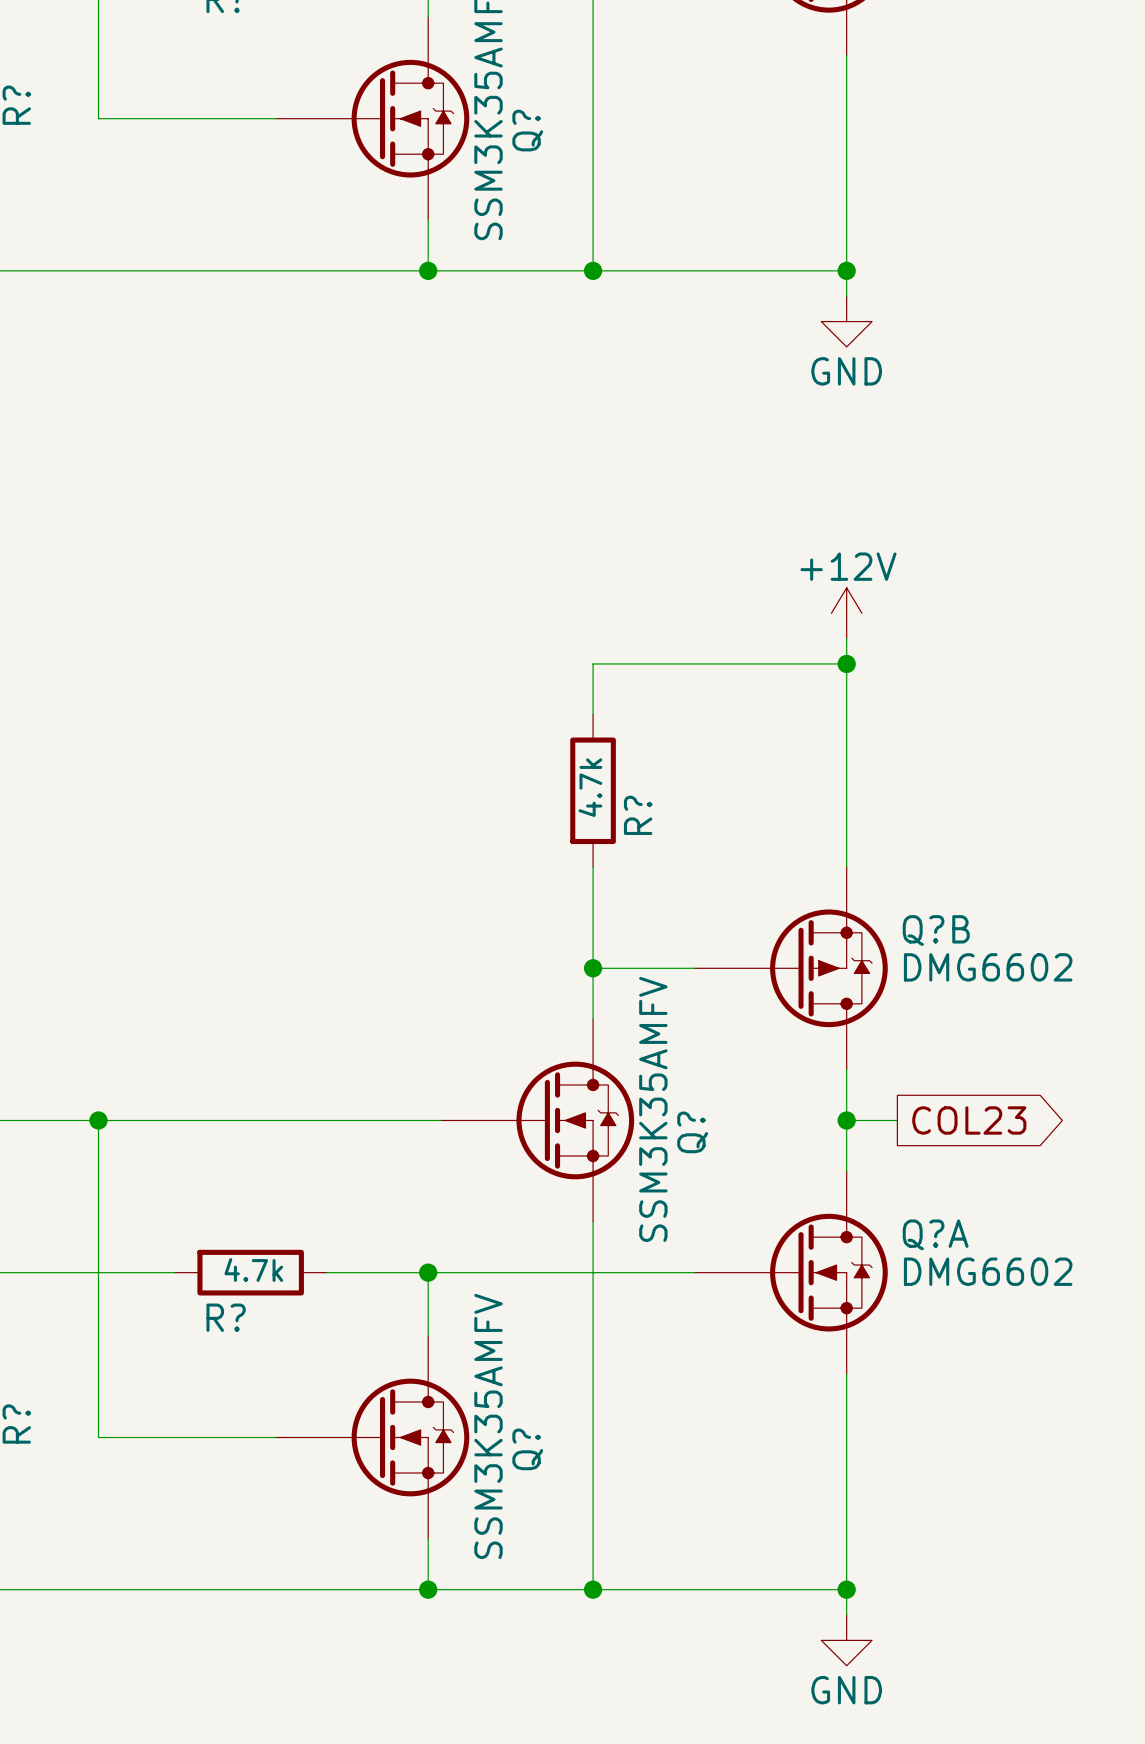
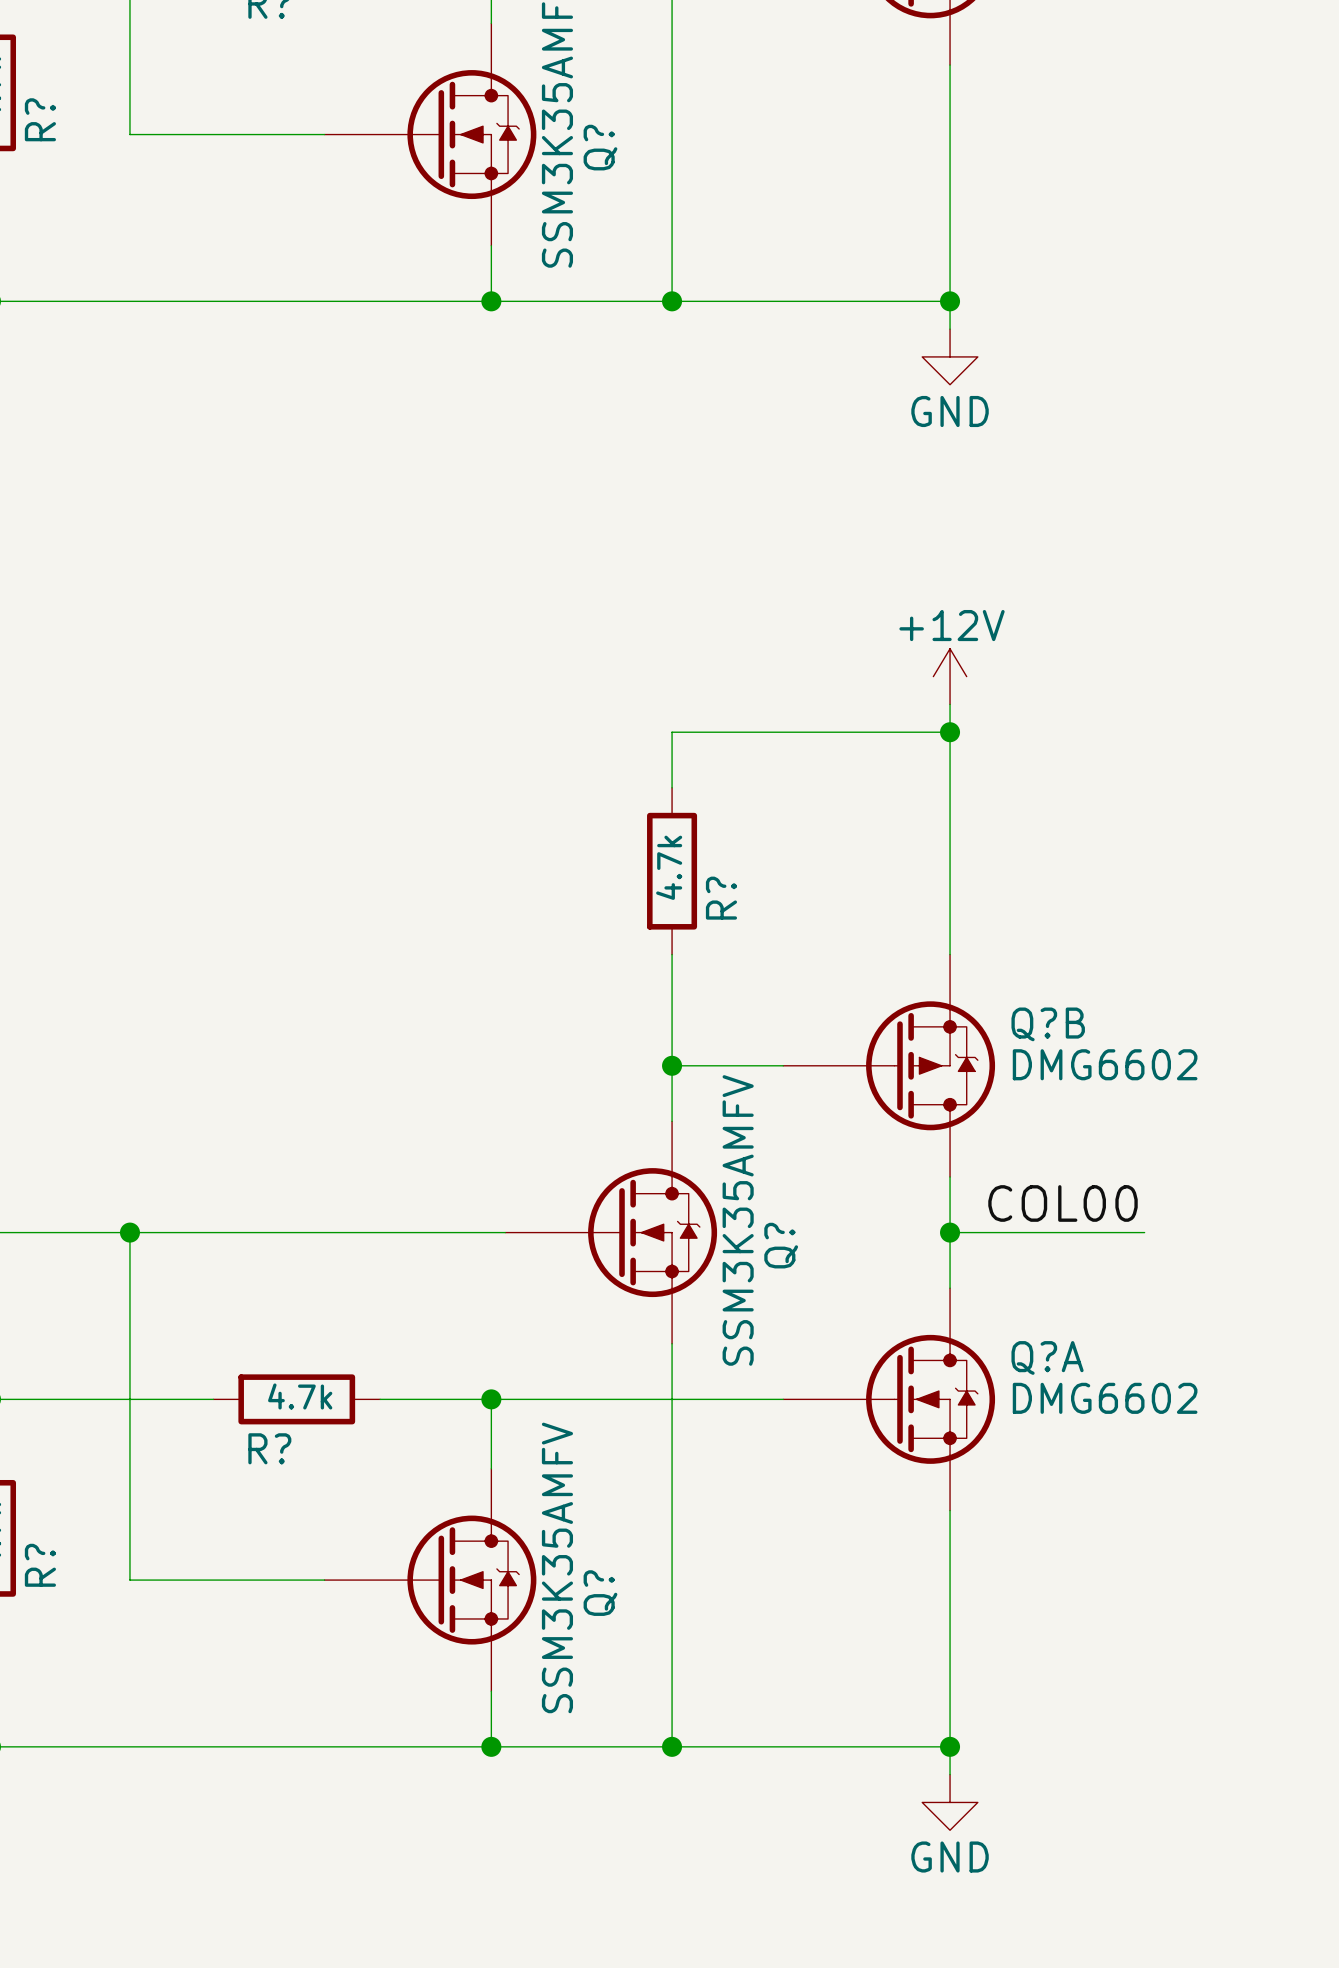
label: none -> COL00 (1063, 1203)
wire: none -> (1005, 1232) (1144, 1232)
global label: COL23 (969, 1120) -> none

